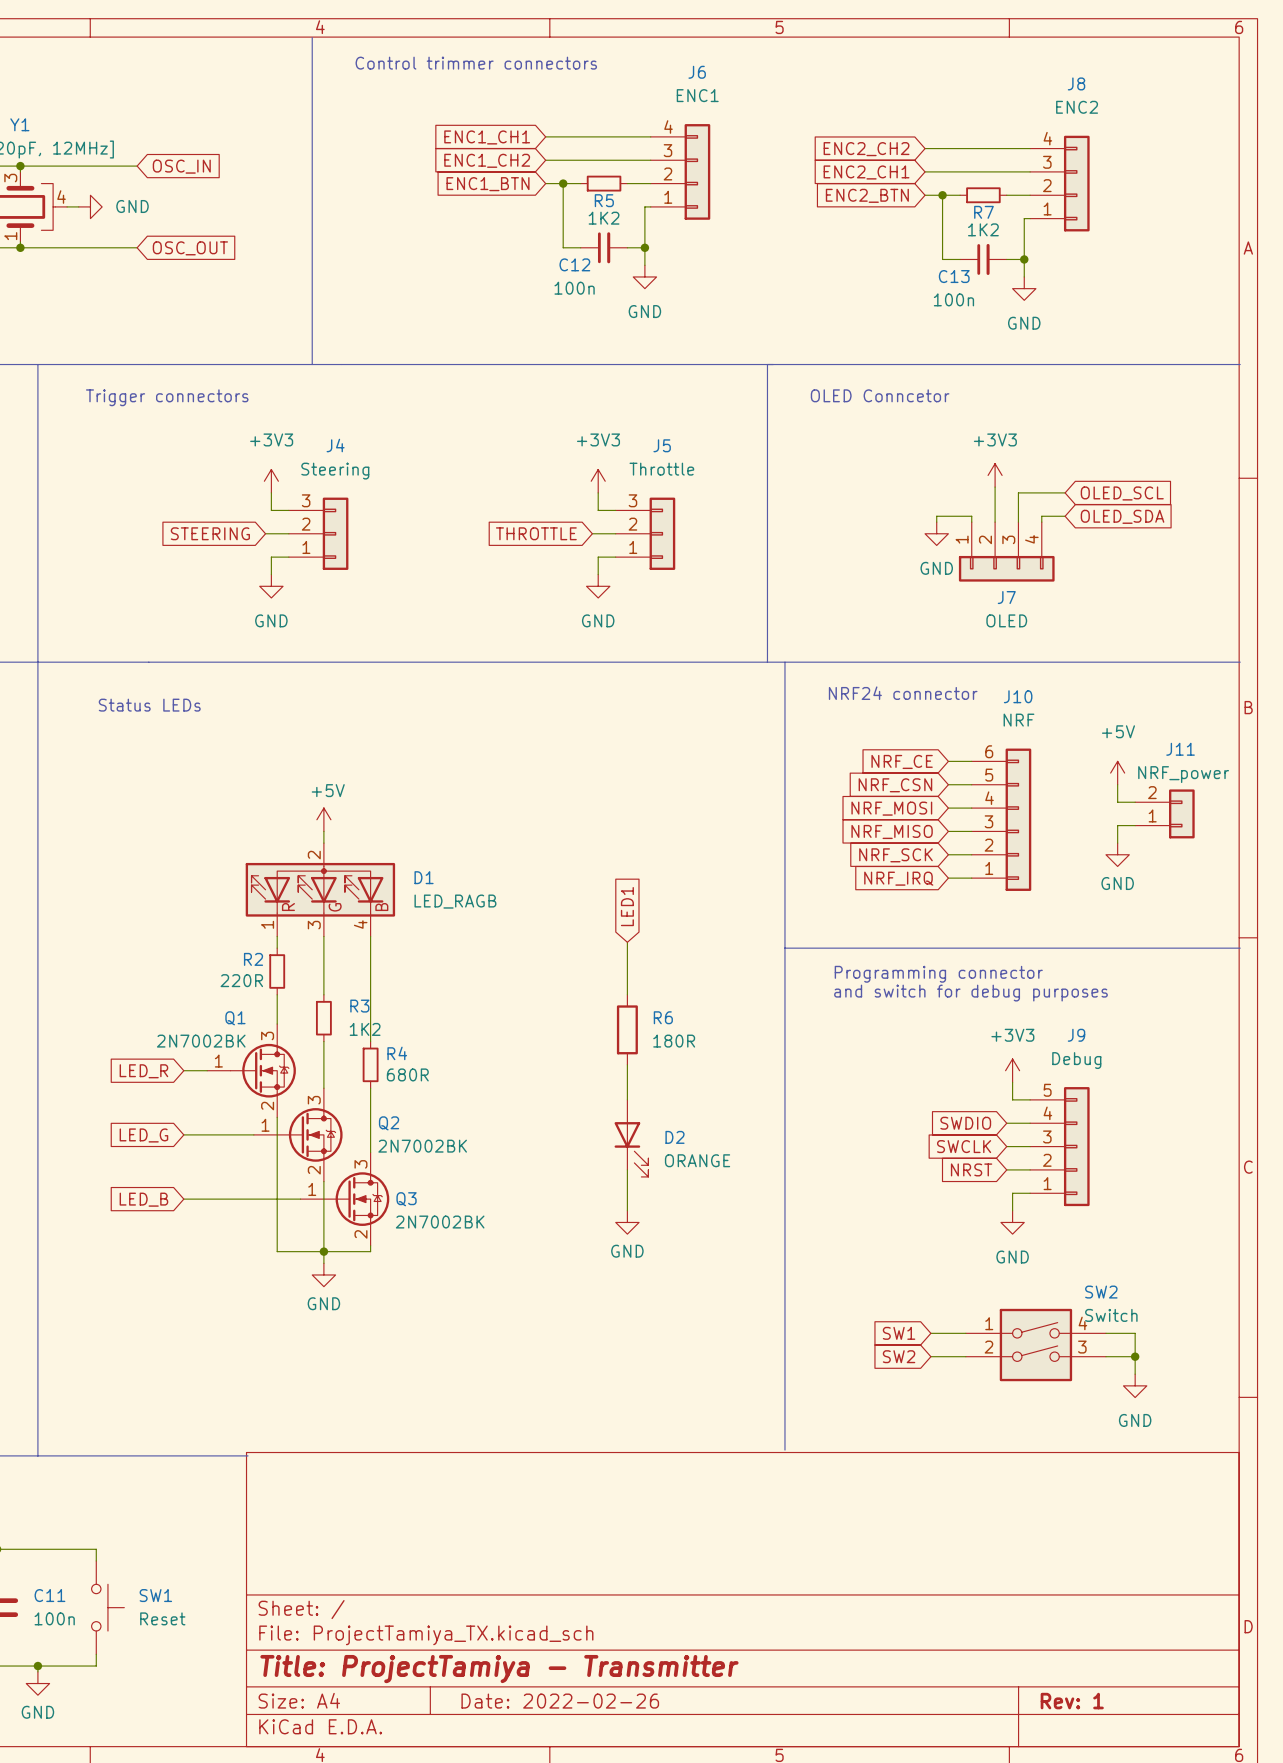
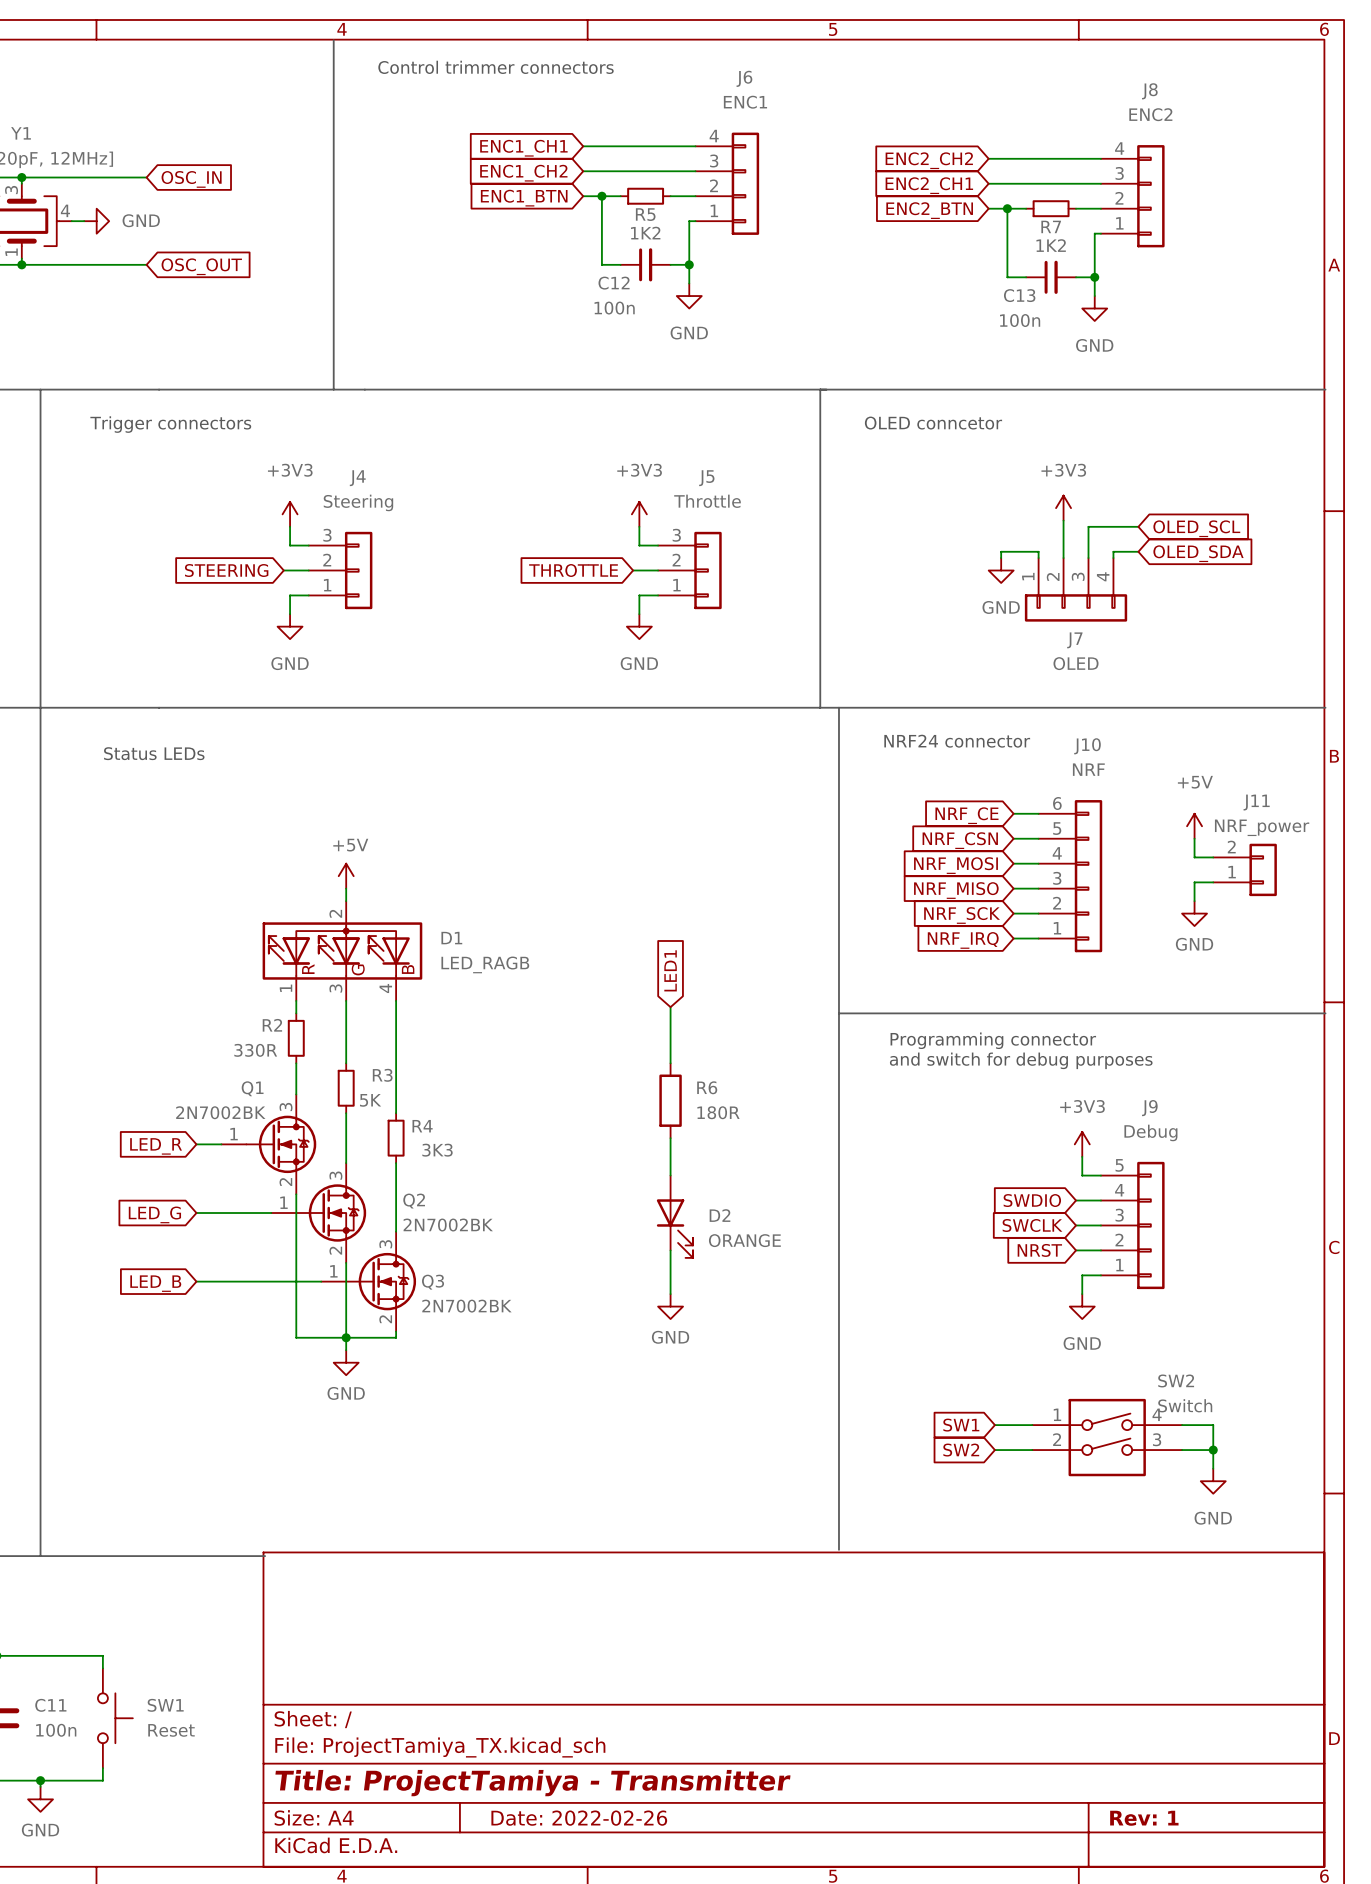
text: OLED Conncetor (880, 395) -> OLED conncetor (933, 423)
R2 value: 220R (241, 980) -> 330R (255, 1050)
R3 value: 1K2 (365, 1029) -> 5K (370, 1100)
R4 value: 680R (407, 1074) -> 3K3 (437, 1150)

